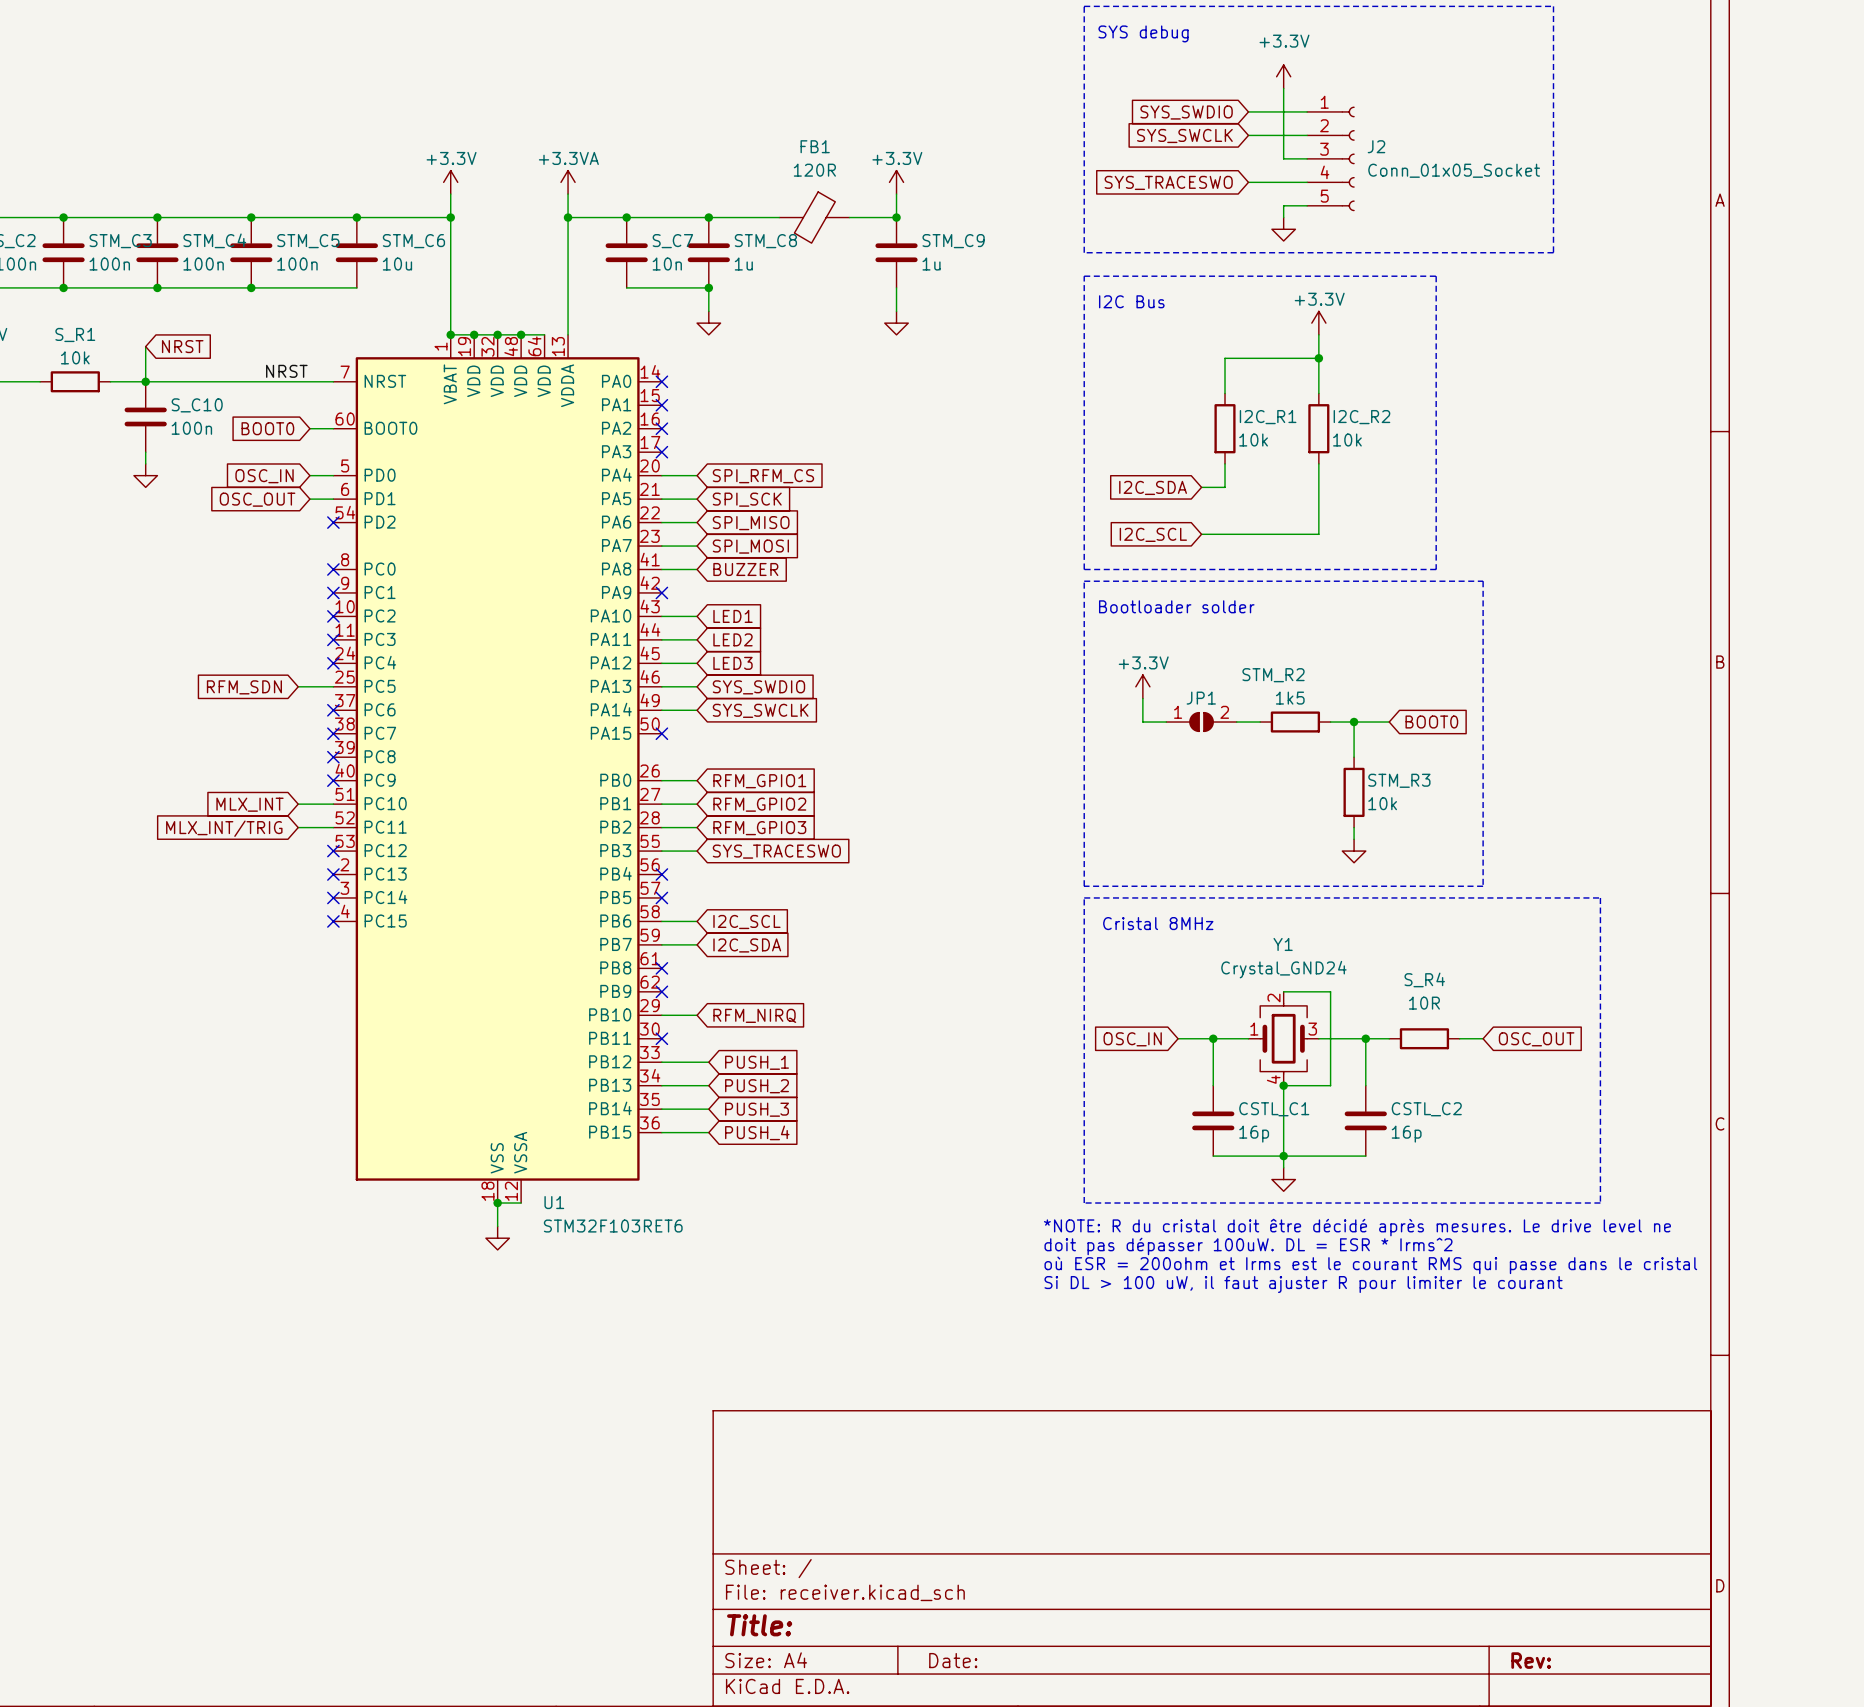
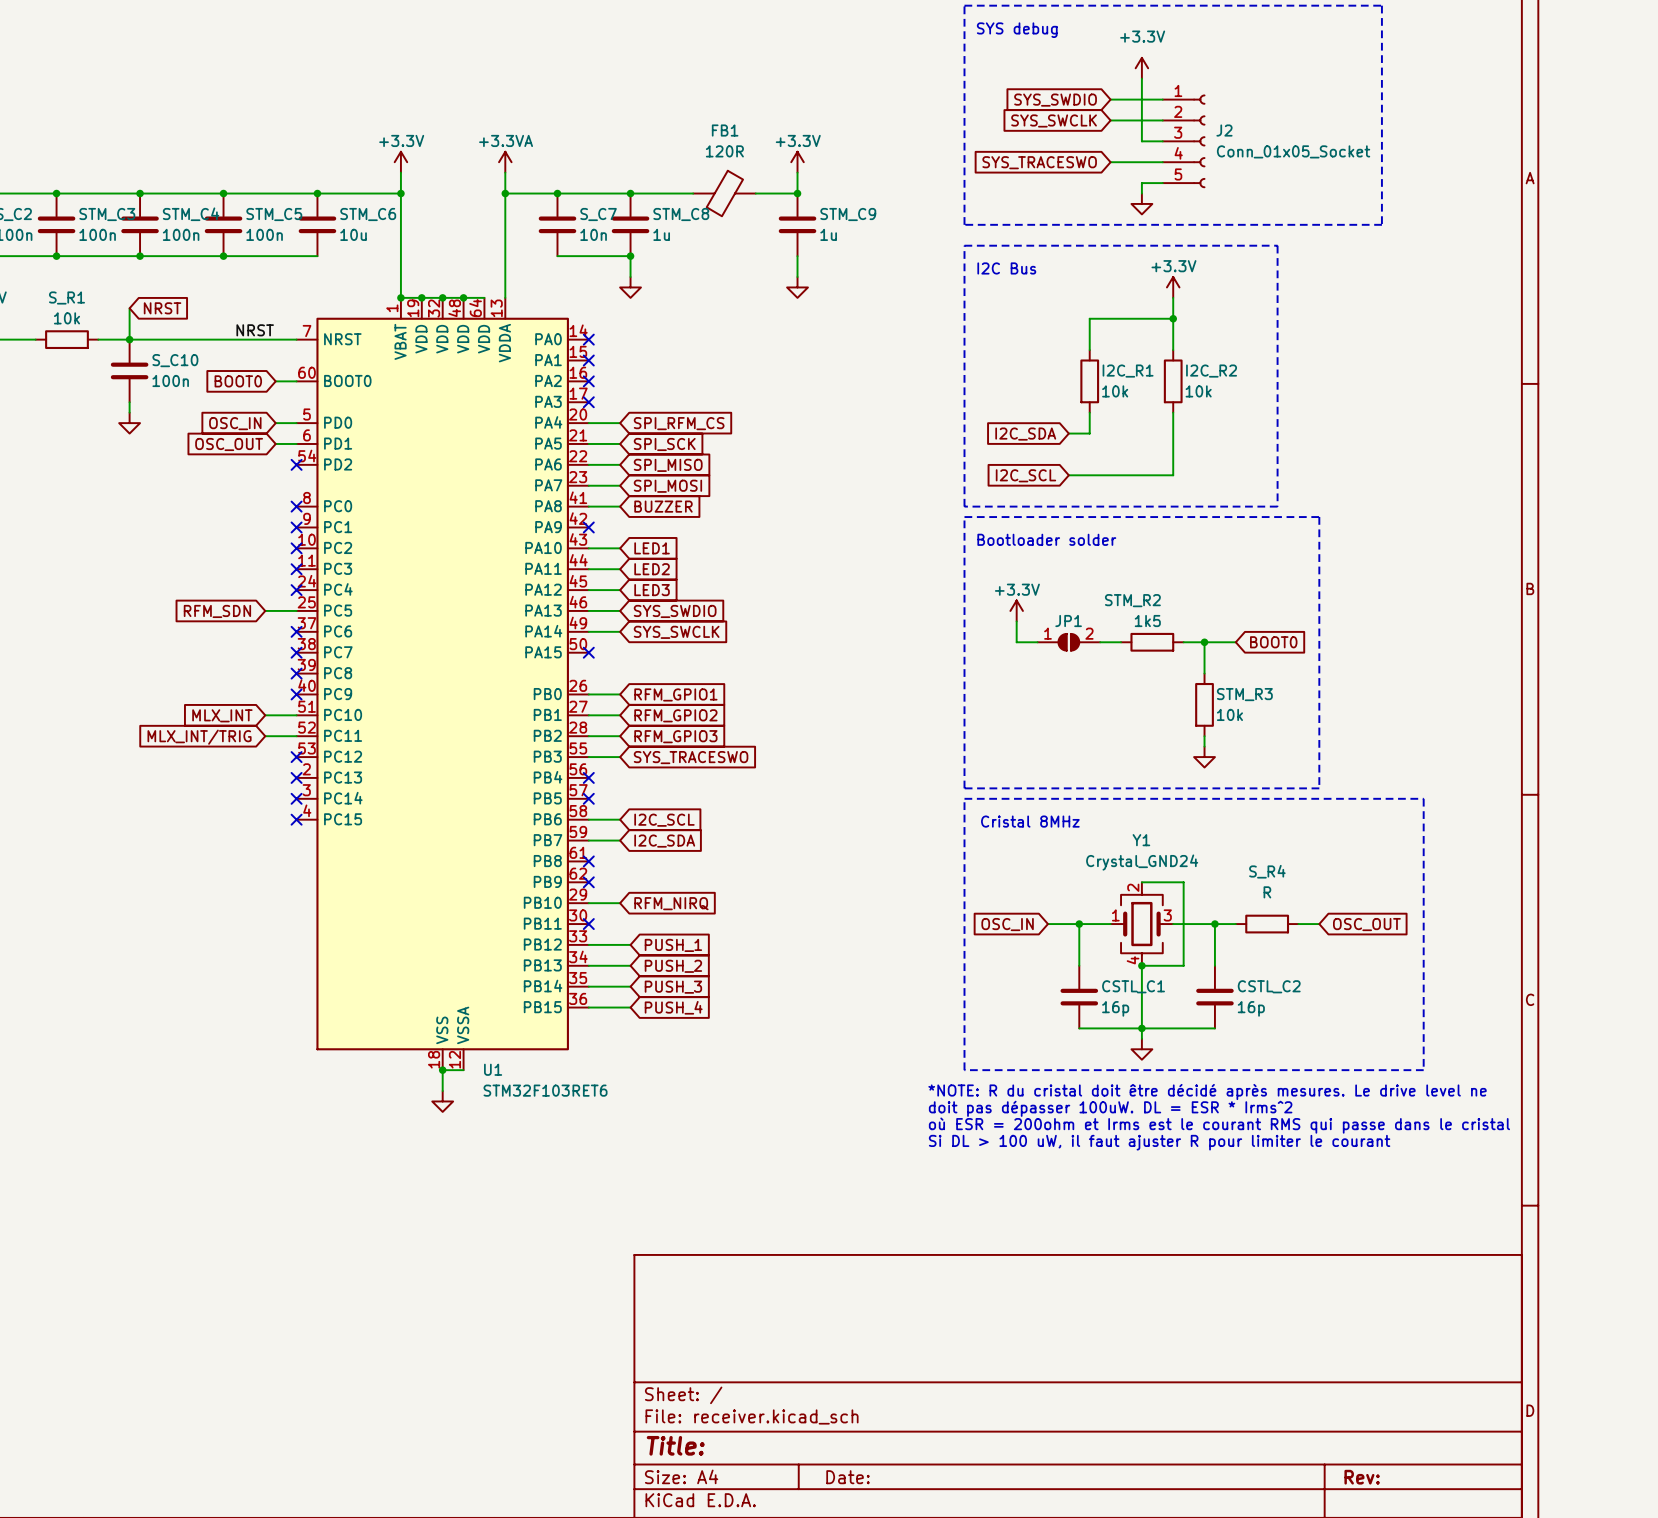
S_R4 value: 10R (1424, 1003) -> R (1267, 892)

